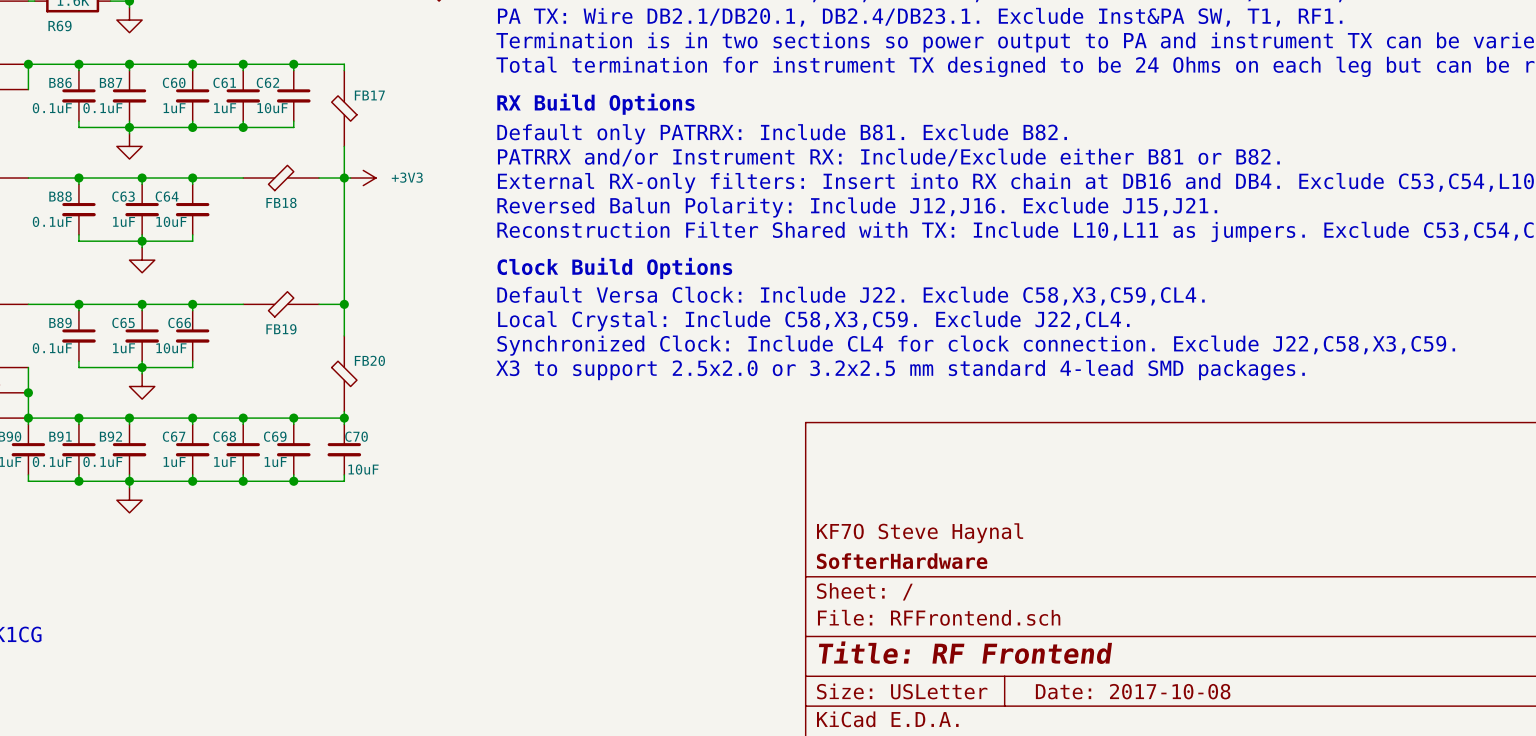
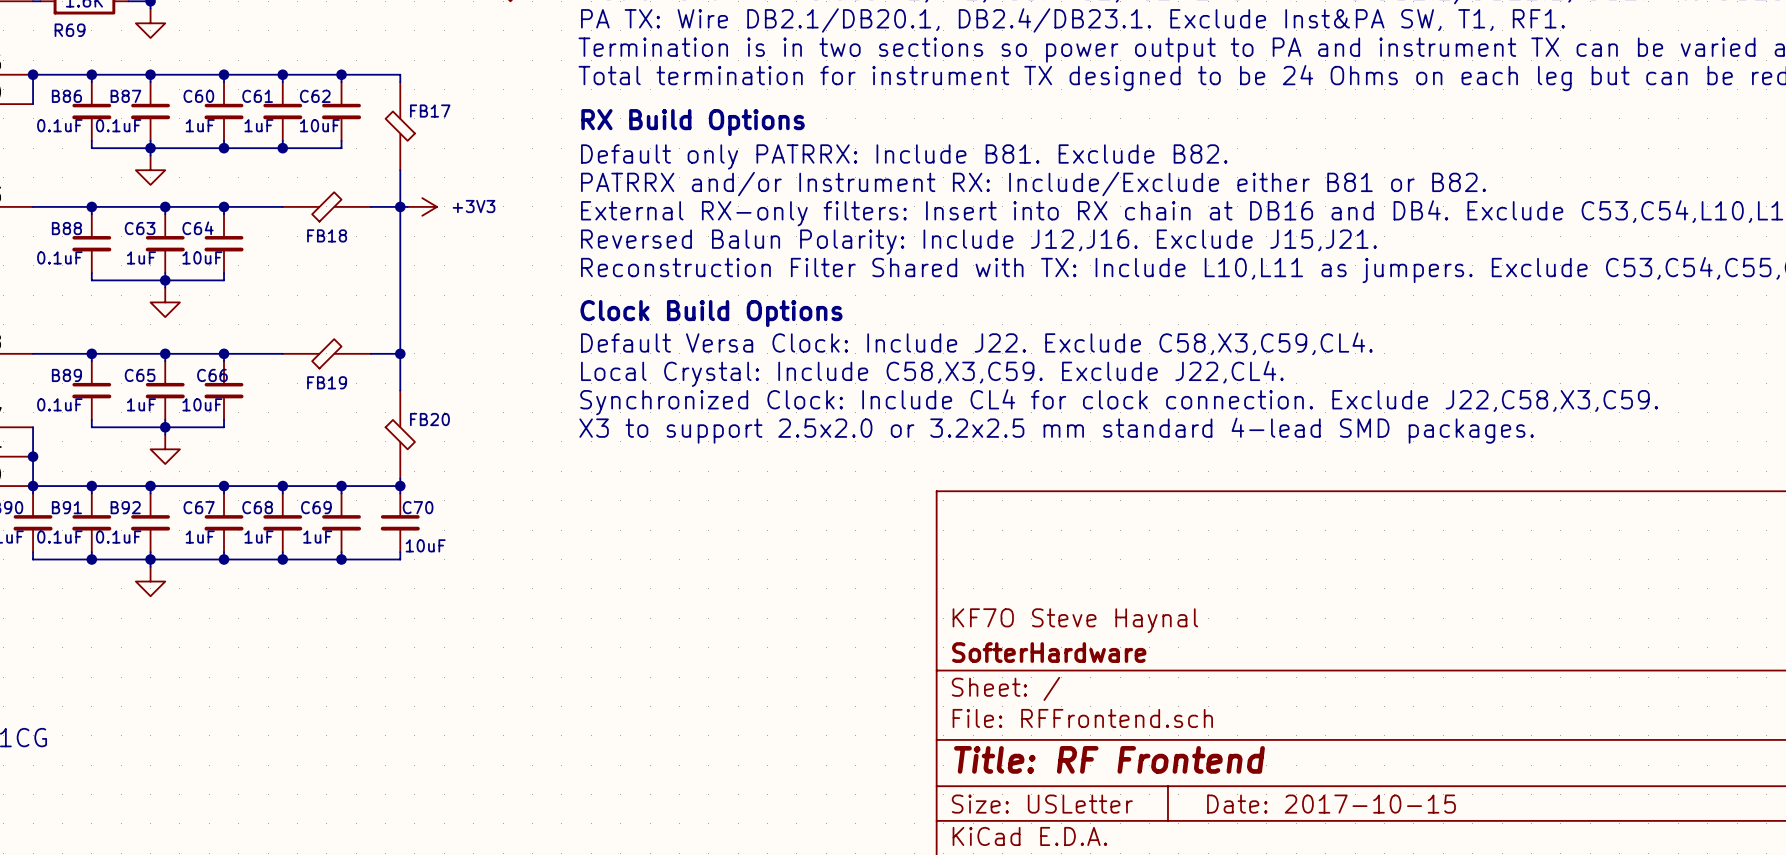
title block: Date: 2017-10-08 (1133, 691) -> Date: 2017-10-15 (1331, 804)

